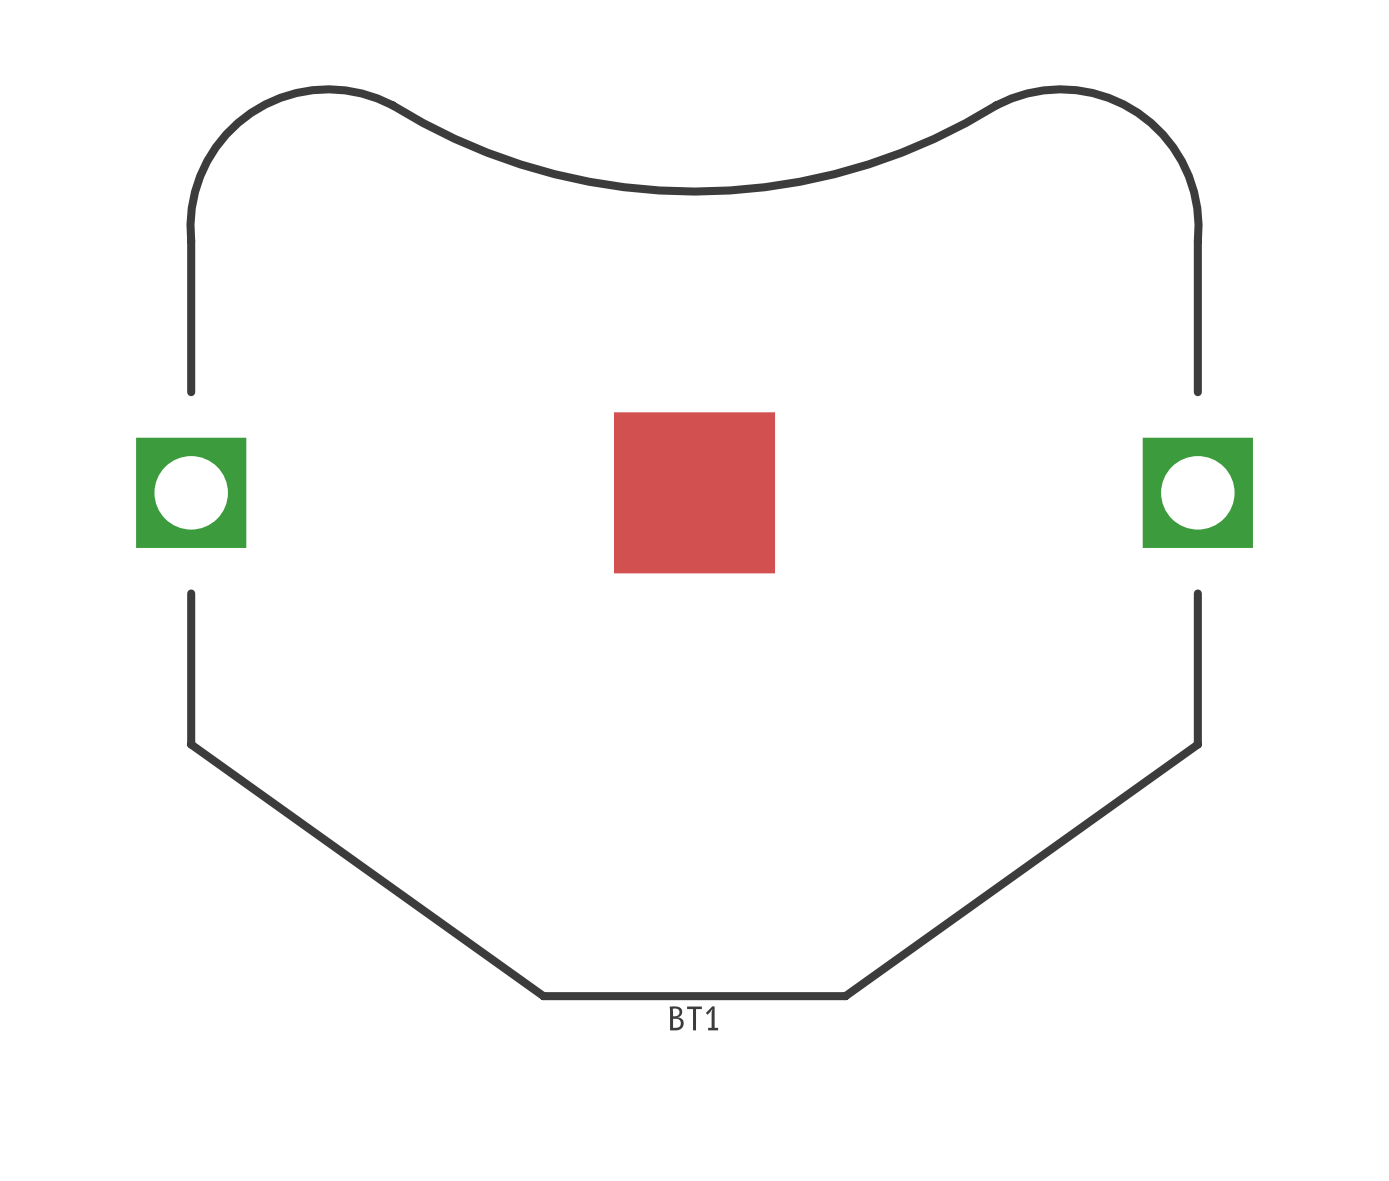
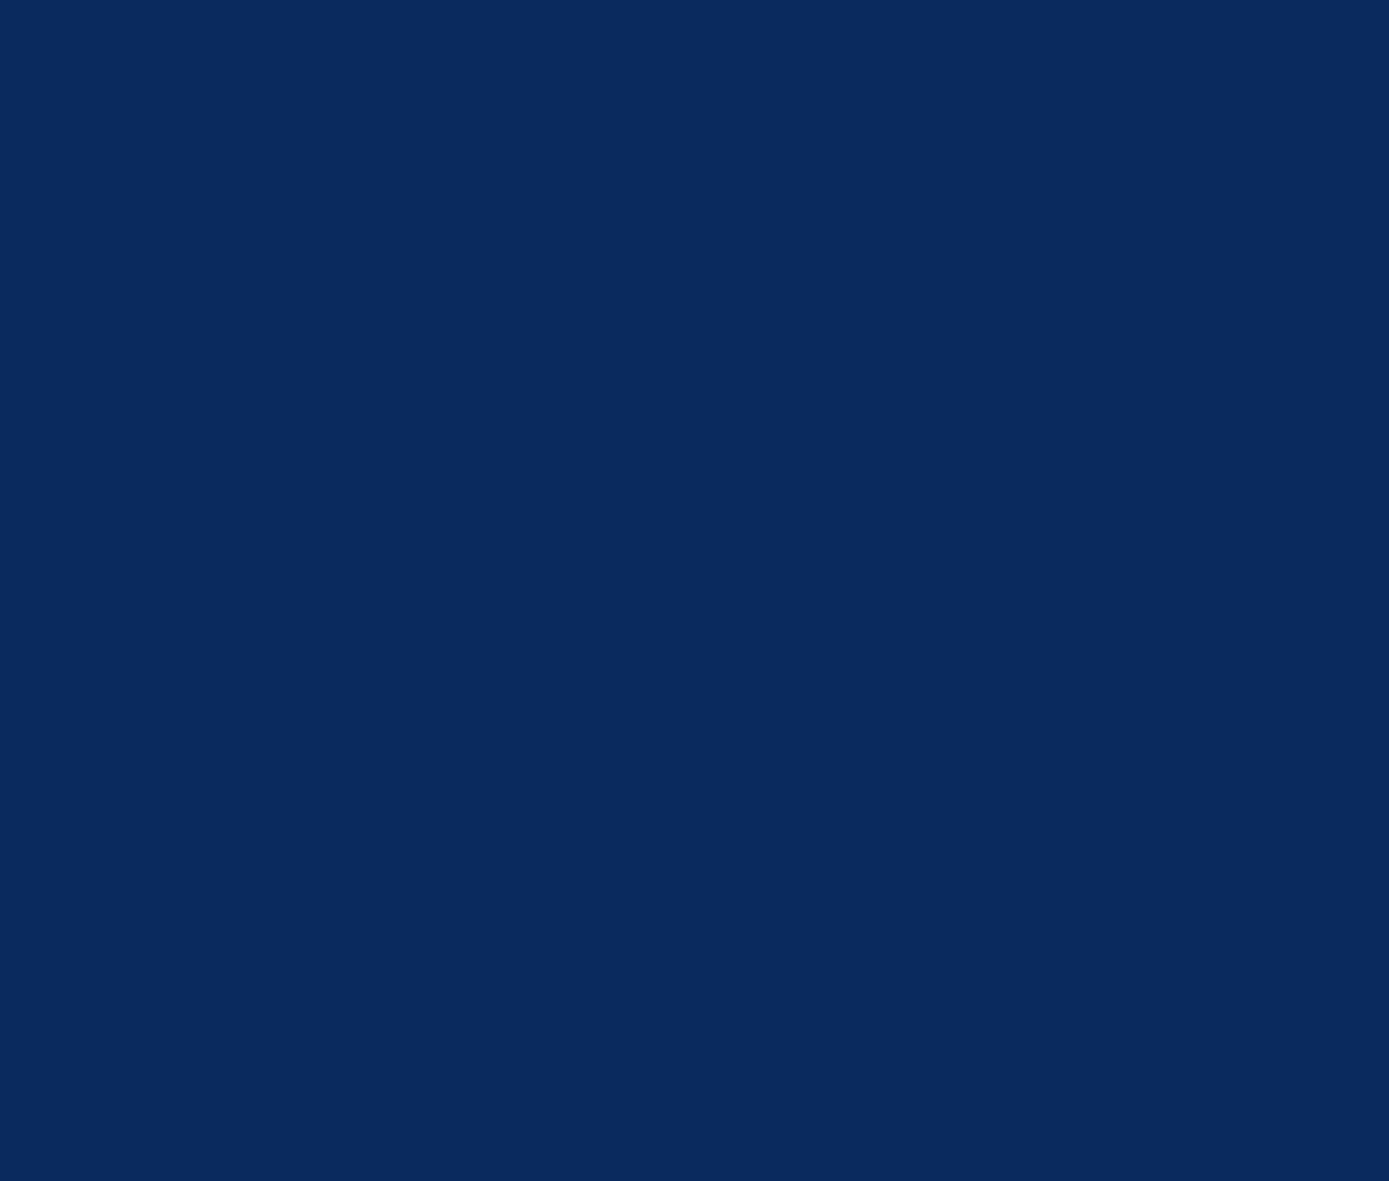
BT1: (694, 542) -> none

